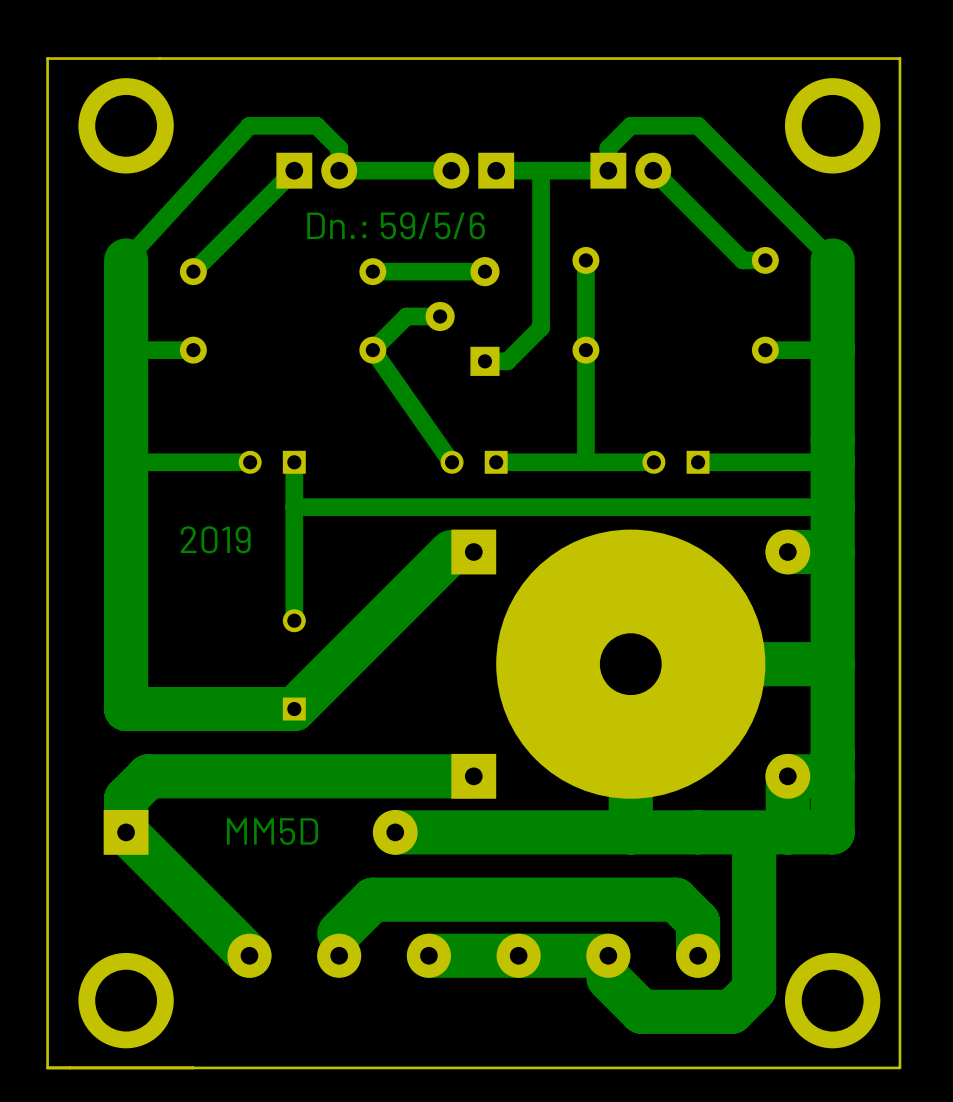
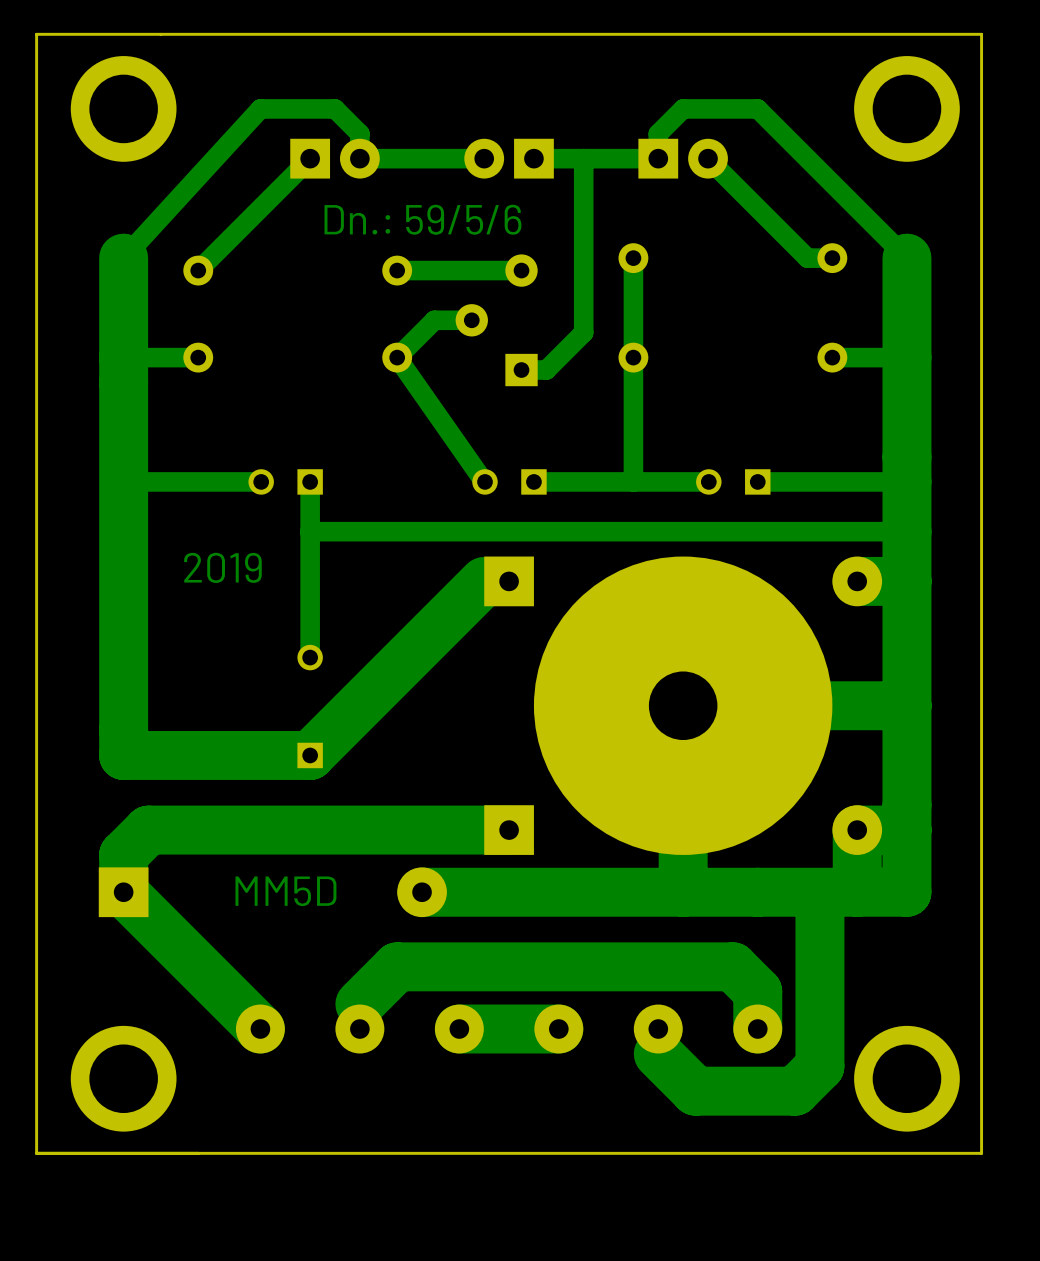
track: (608, 955) (518, 955) -> none

